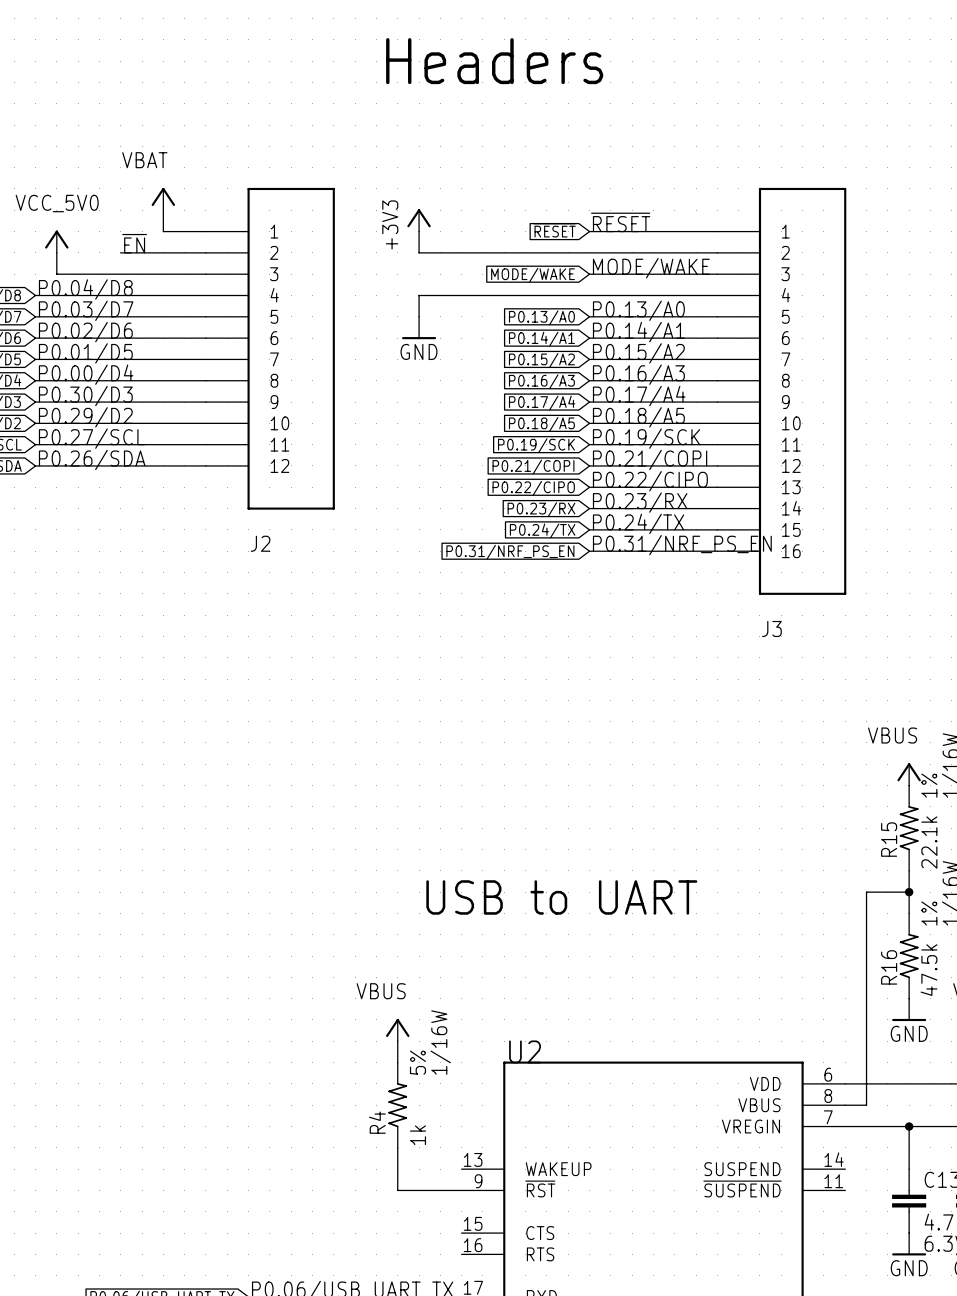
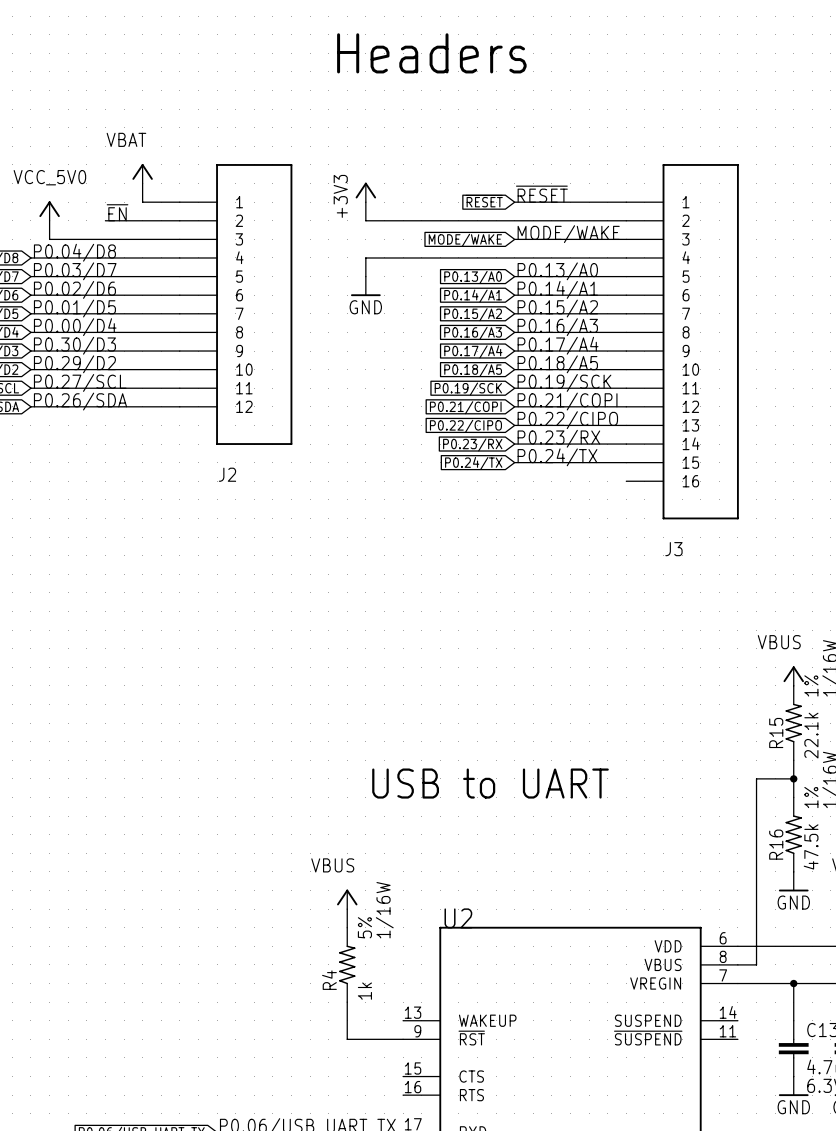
label: P0.31/NRF_PS_EN (682, 545) -> none
wire: (589, 551) (717, 551) -> none
global label: P0.31/NRF_PS_EN (510, 552) -> none

